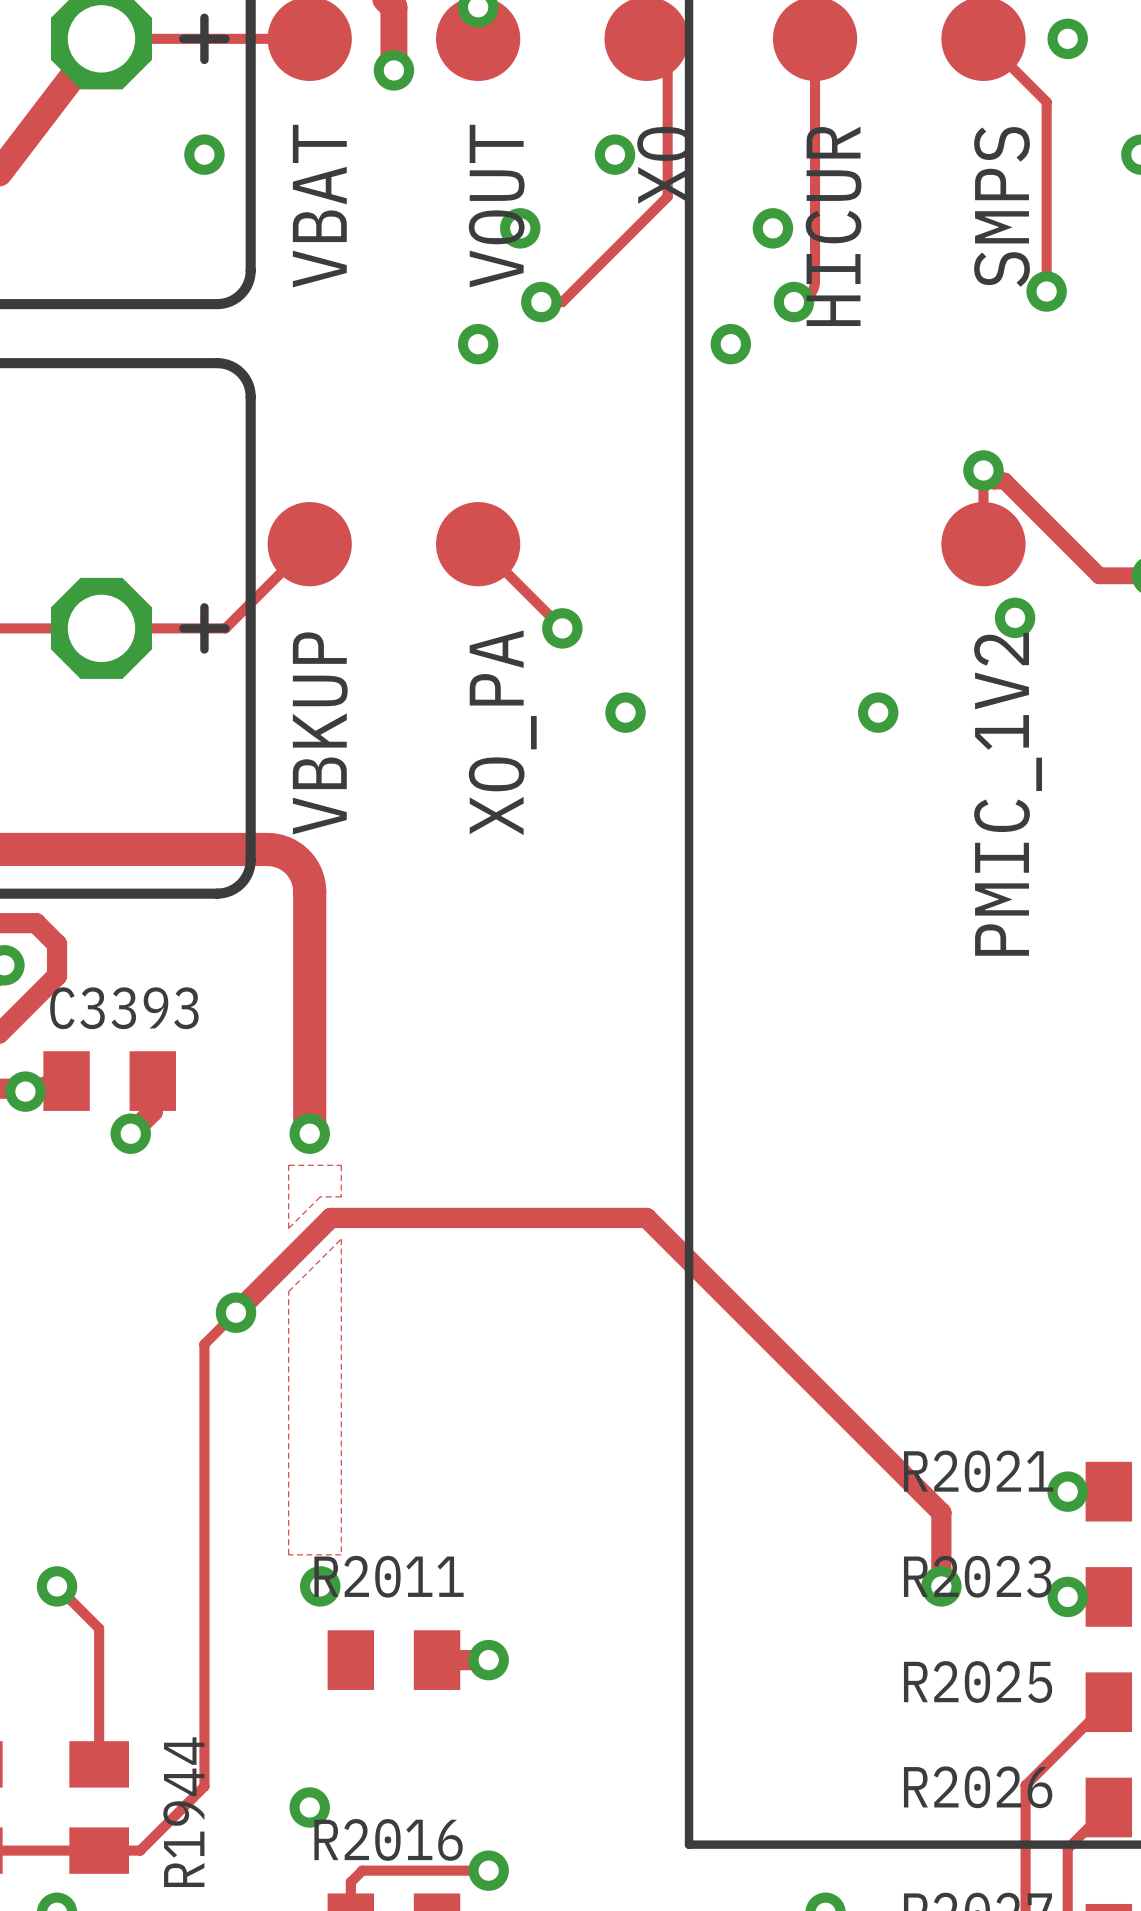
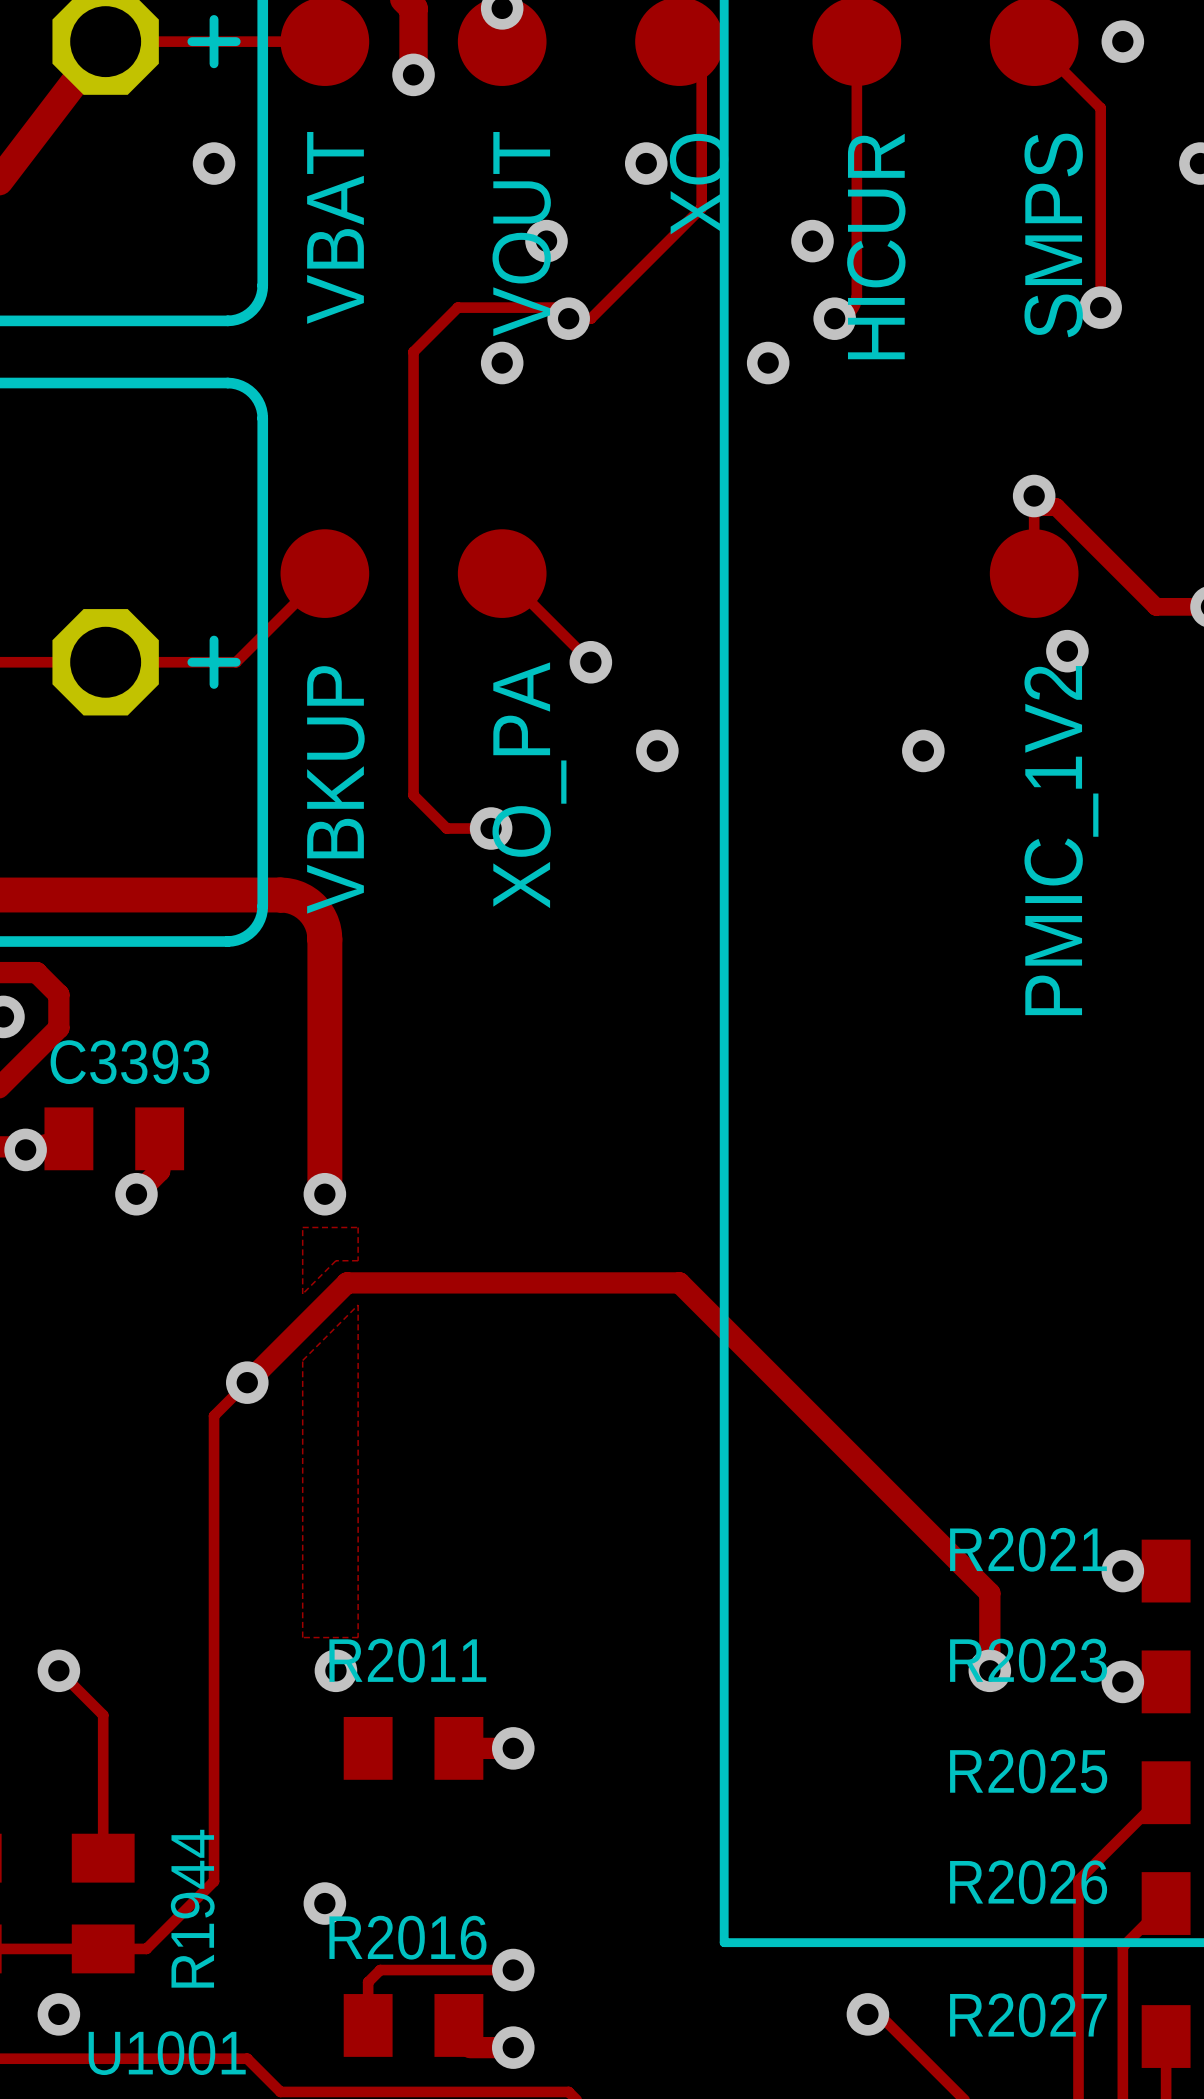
track: none -> (568, 318) (557, 307) (457, 307) (413, 351) (413, 795) (446, 828) (491, 828)
via: none -> (491, 828)

